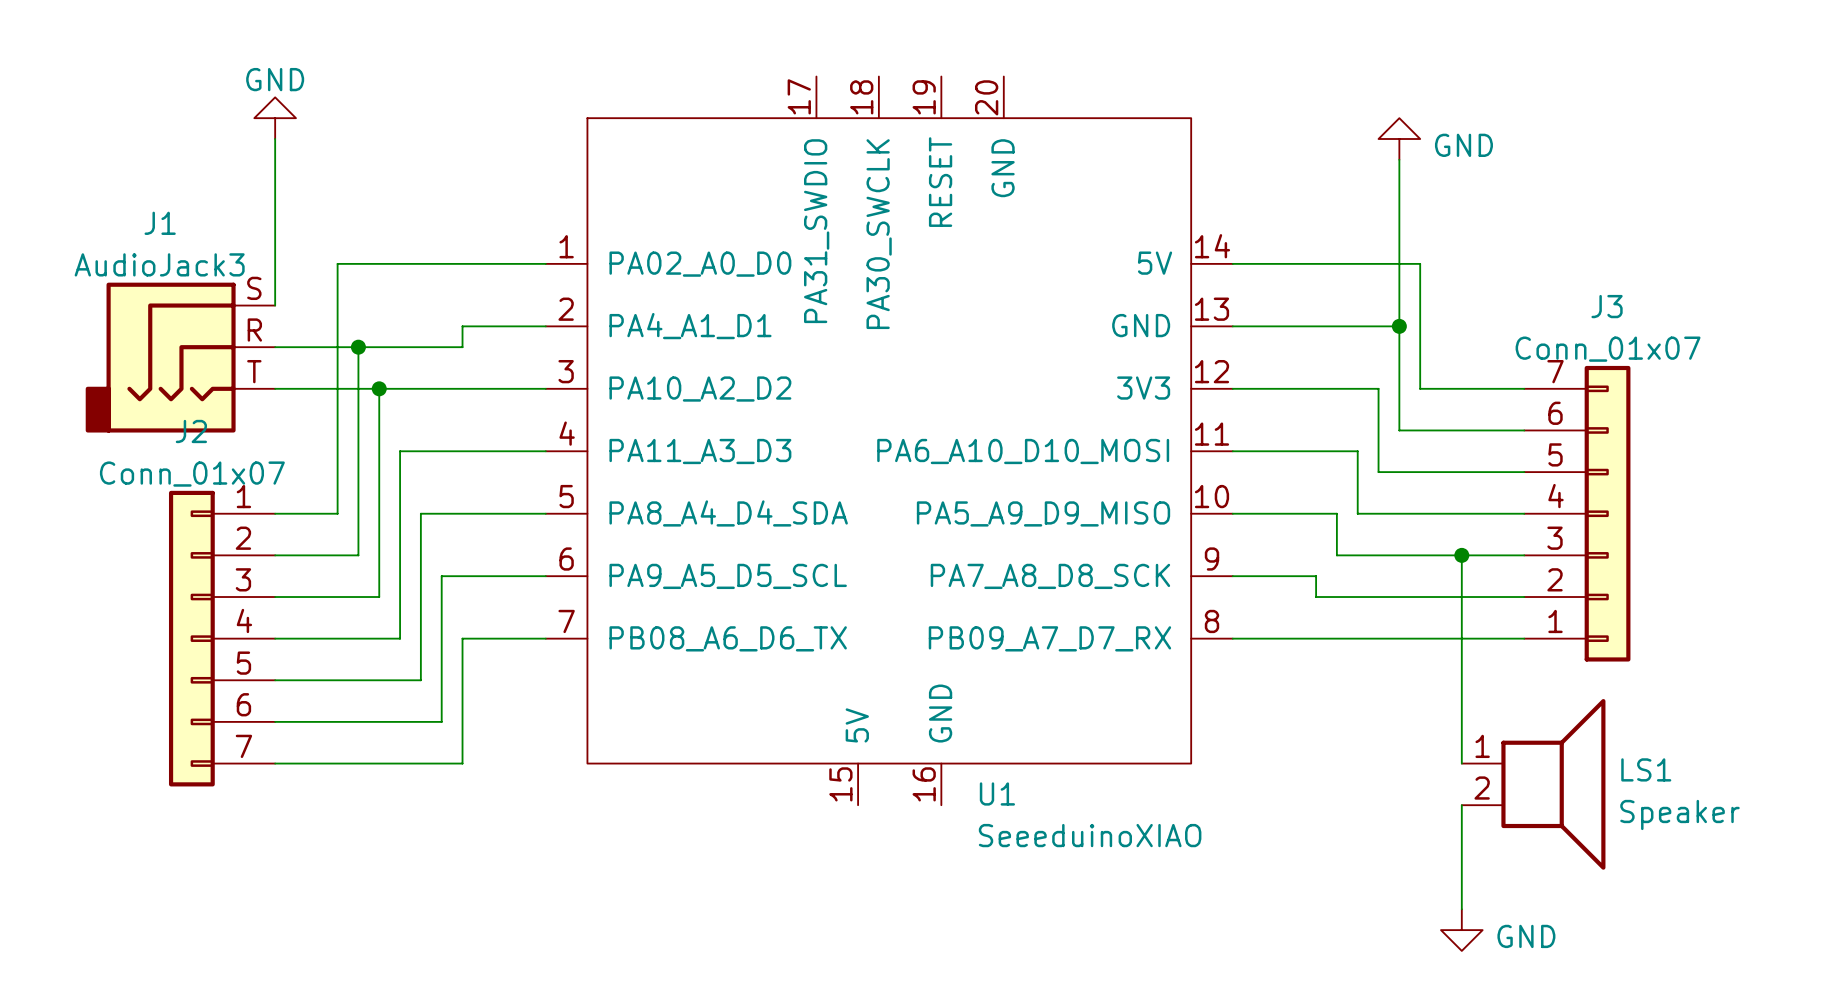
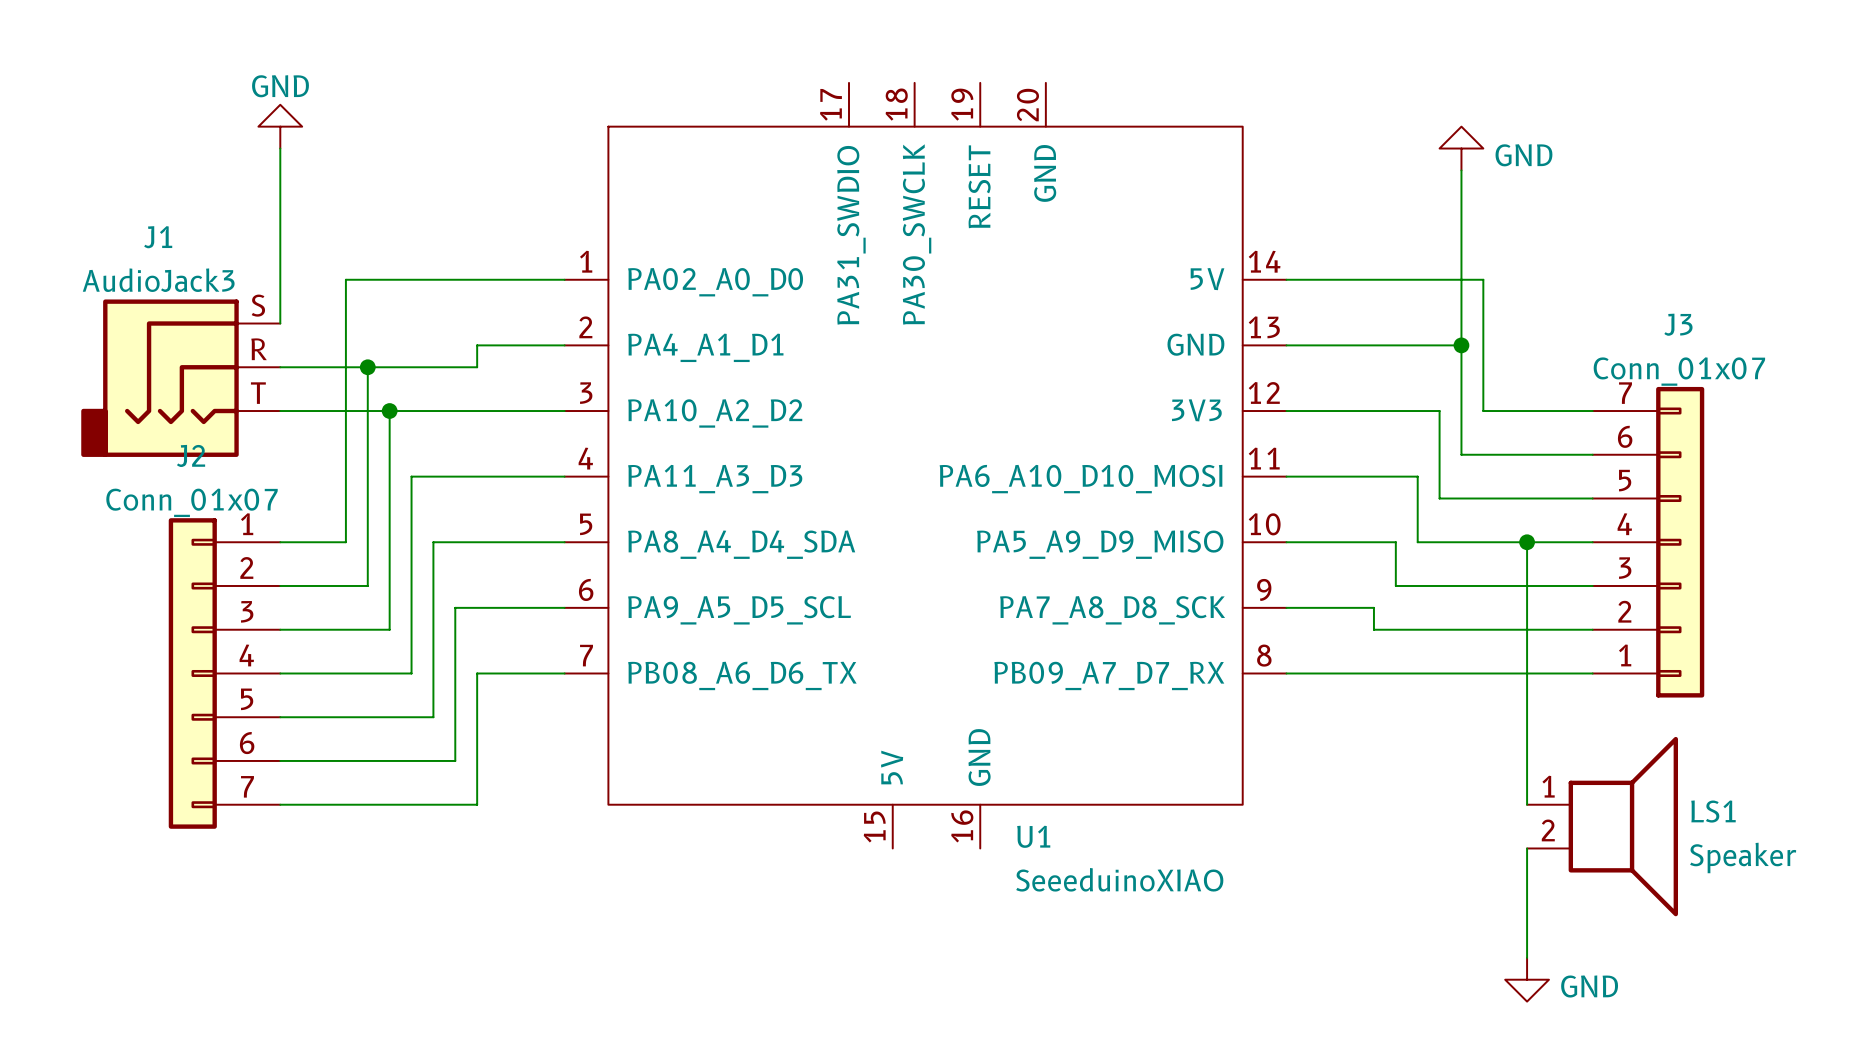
wire: none -> (1527, 542) (1527, 585)
junction position: (1461, 555) -> (1527, 542)

